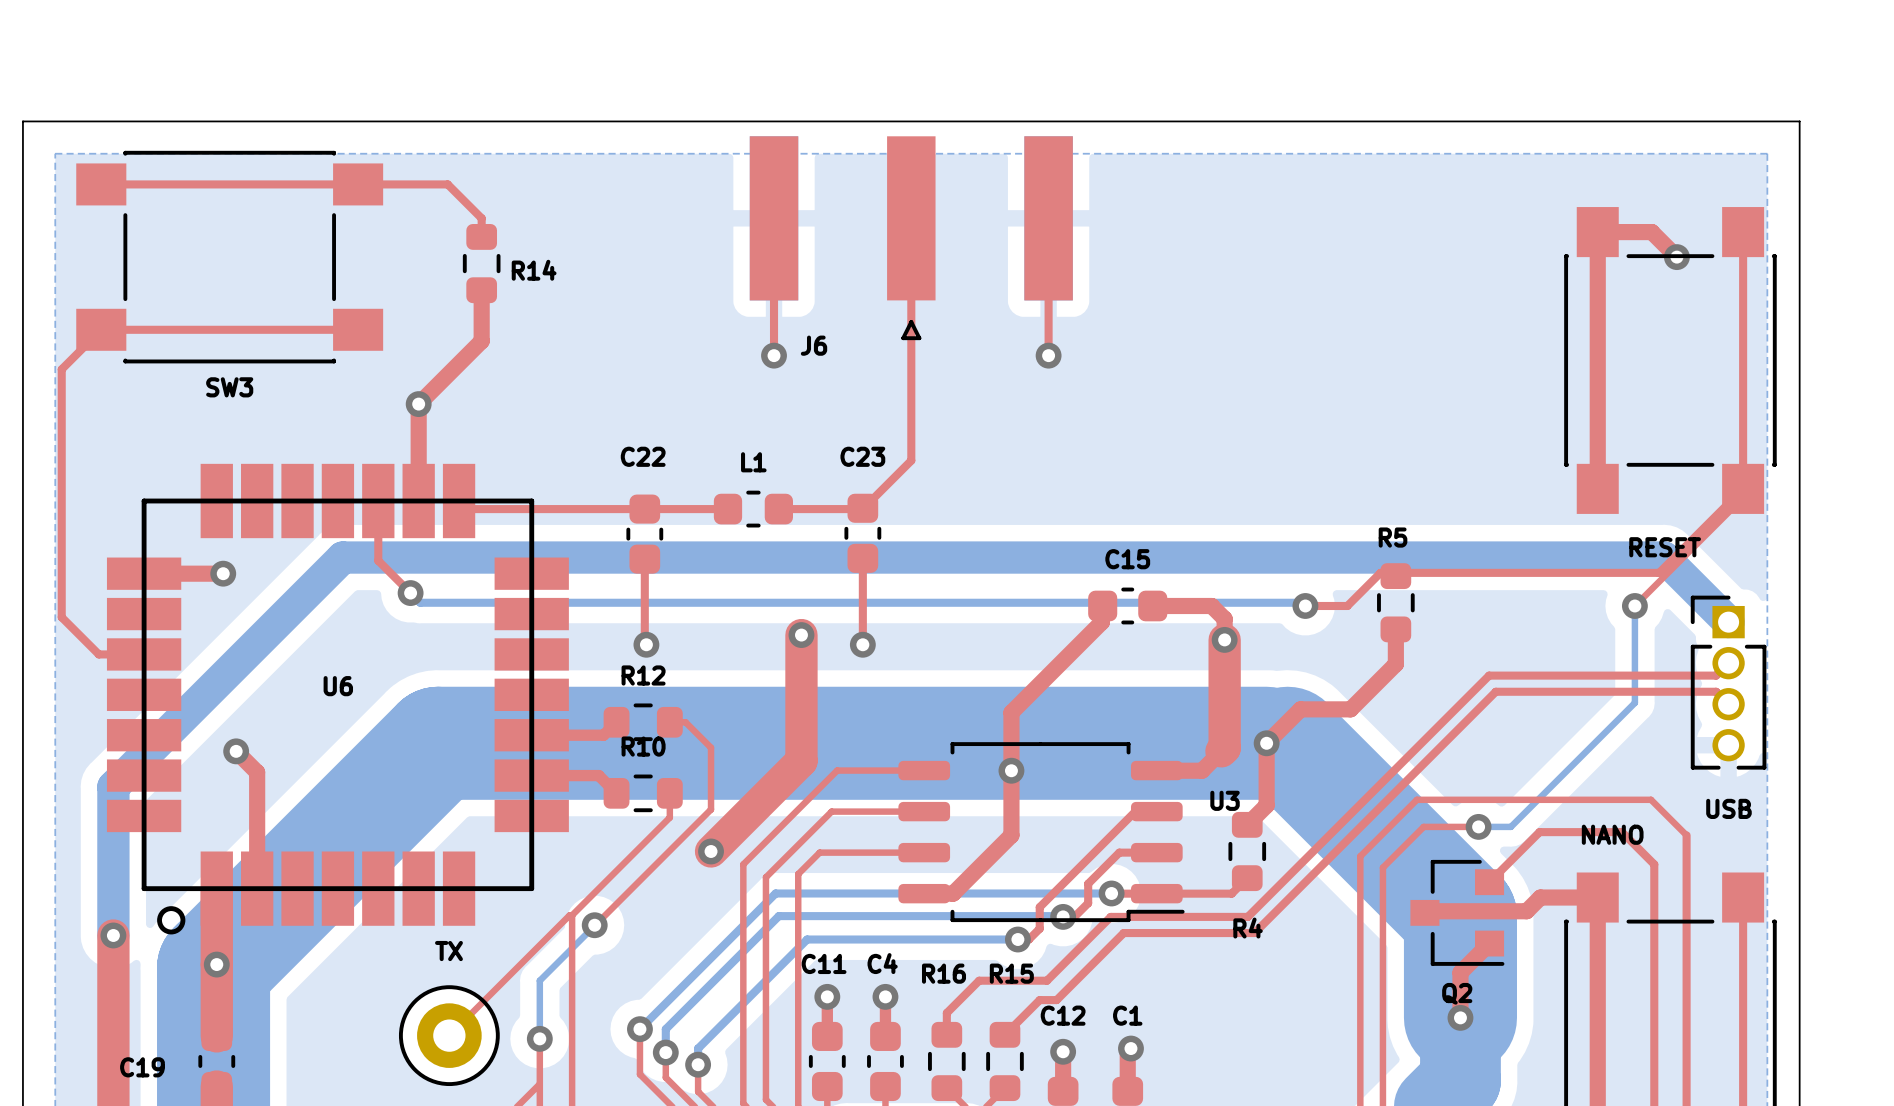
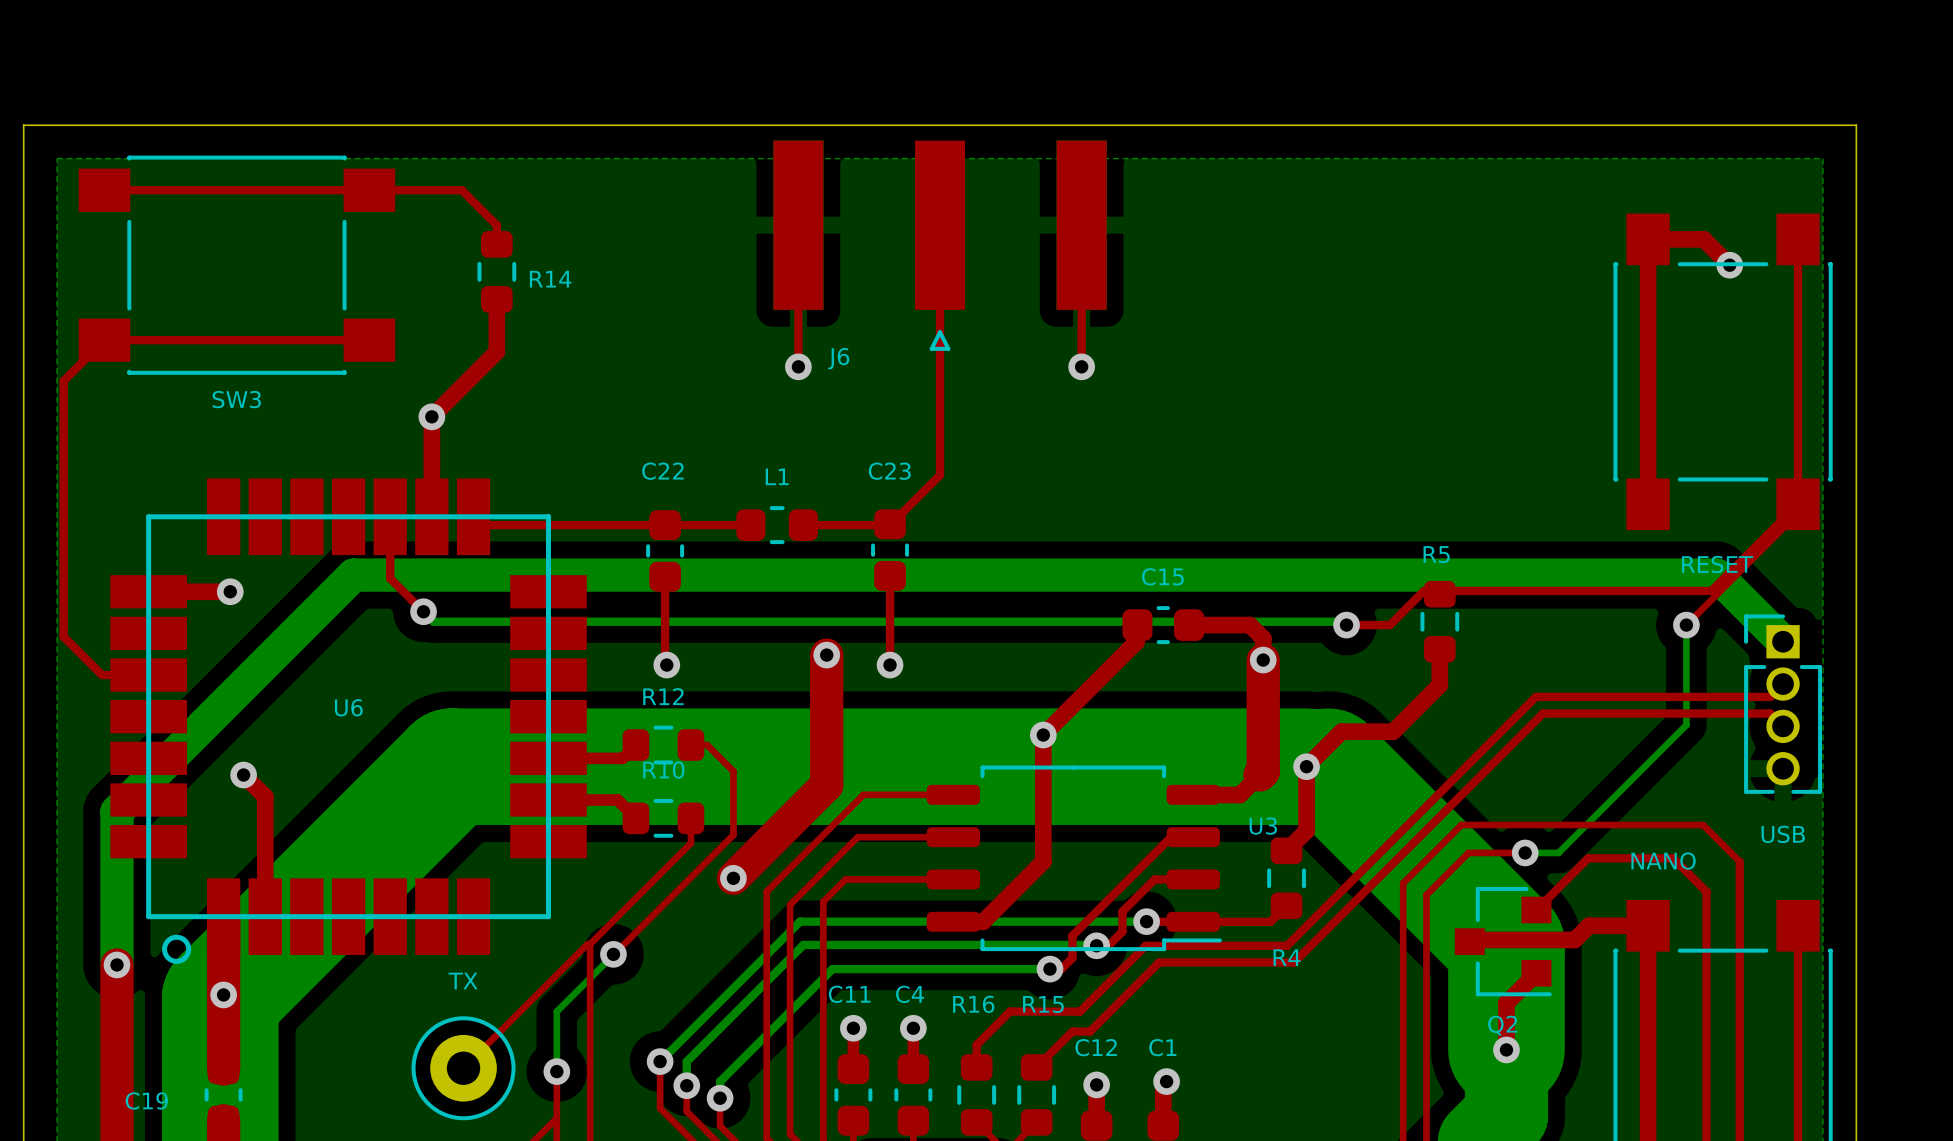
via position: (1011, 770) -> (1043, 735)

